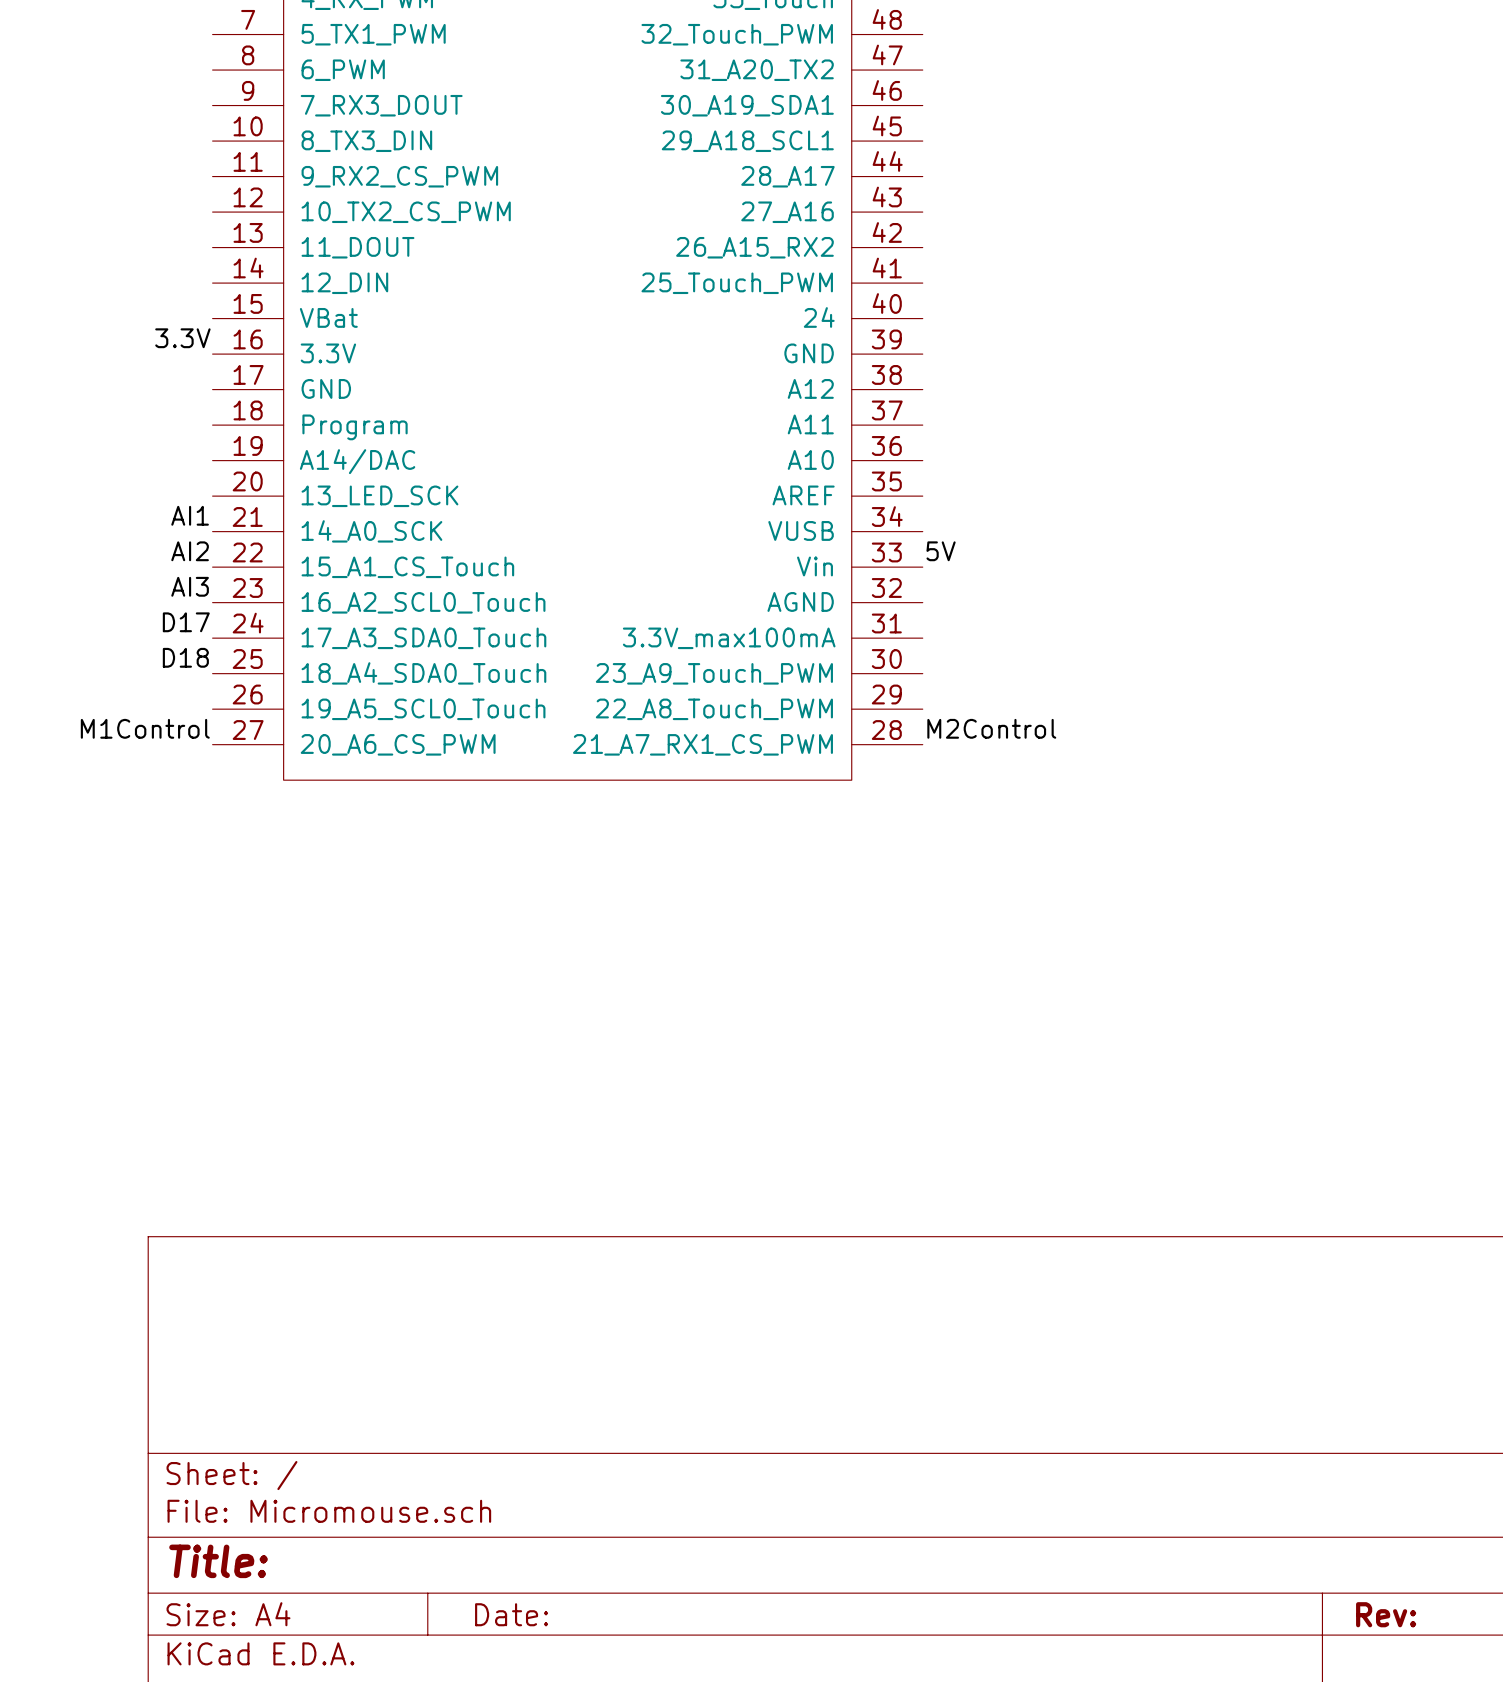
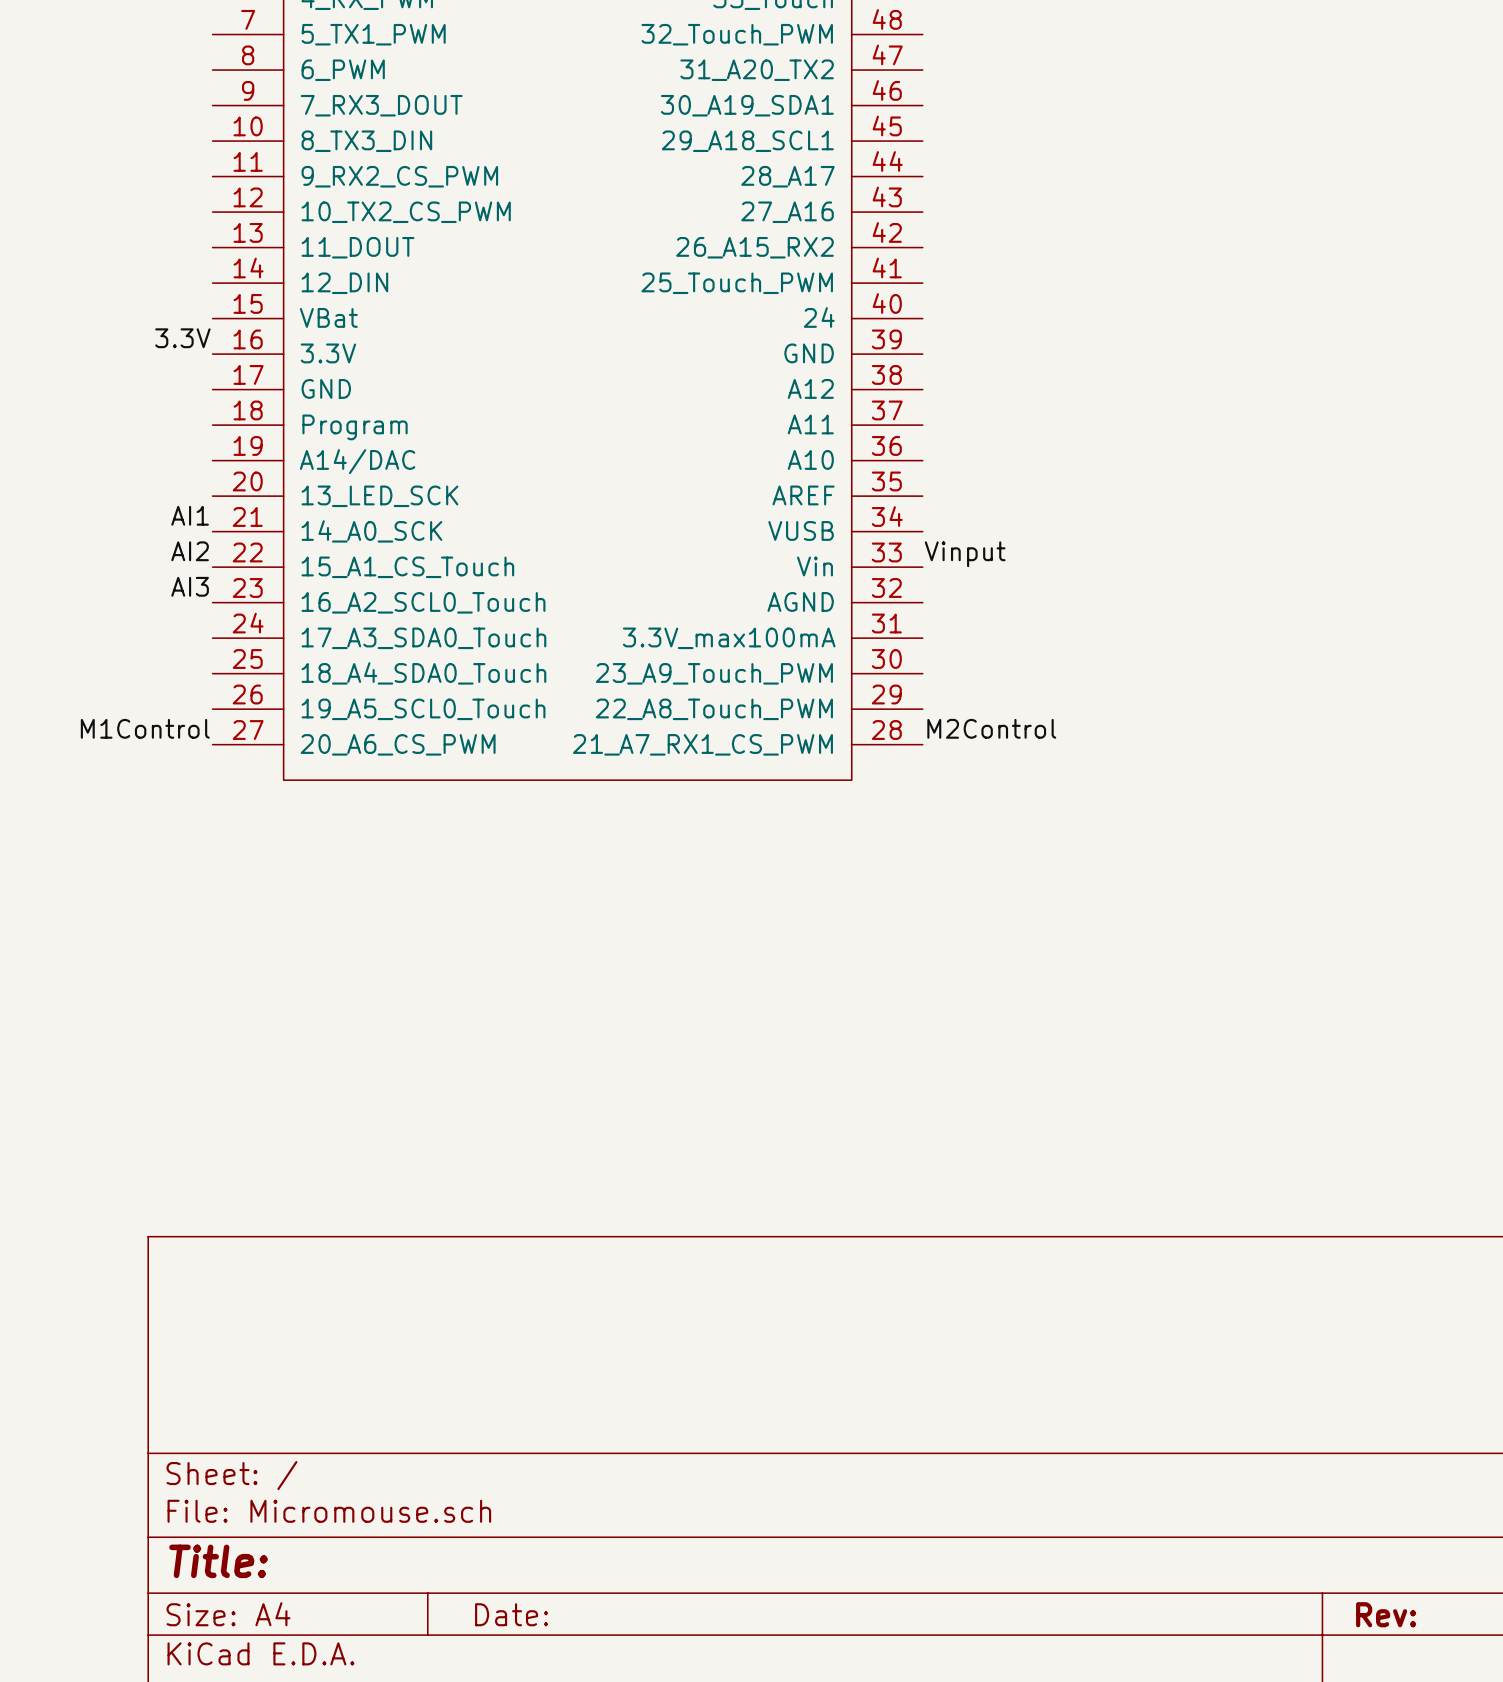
label: 5V (941, 551) -> Vinput (965, 554)
label: D17 (186, 622) -> none
label: D18 (185, 657) -> none

